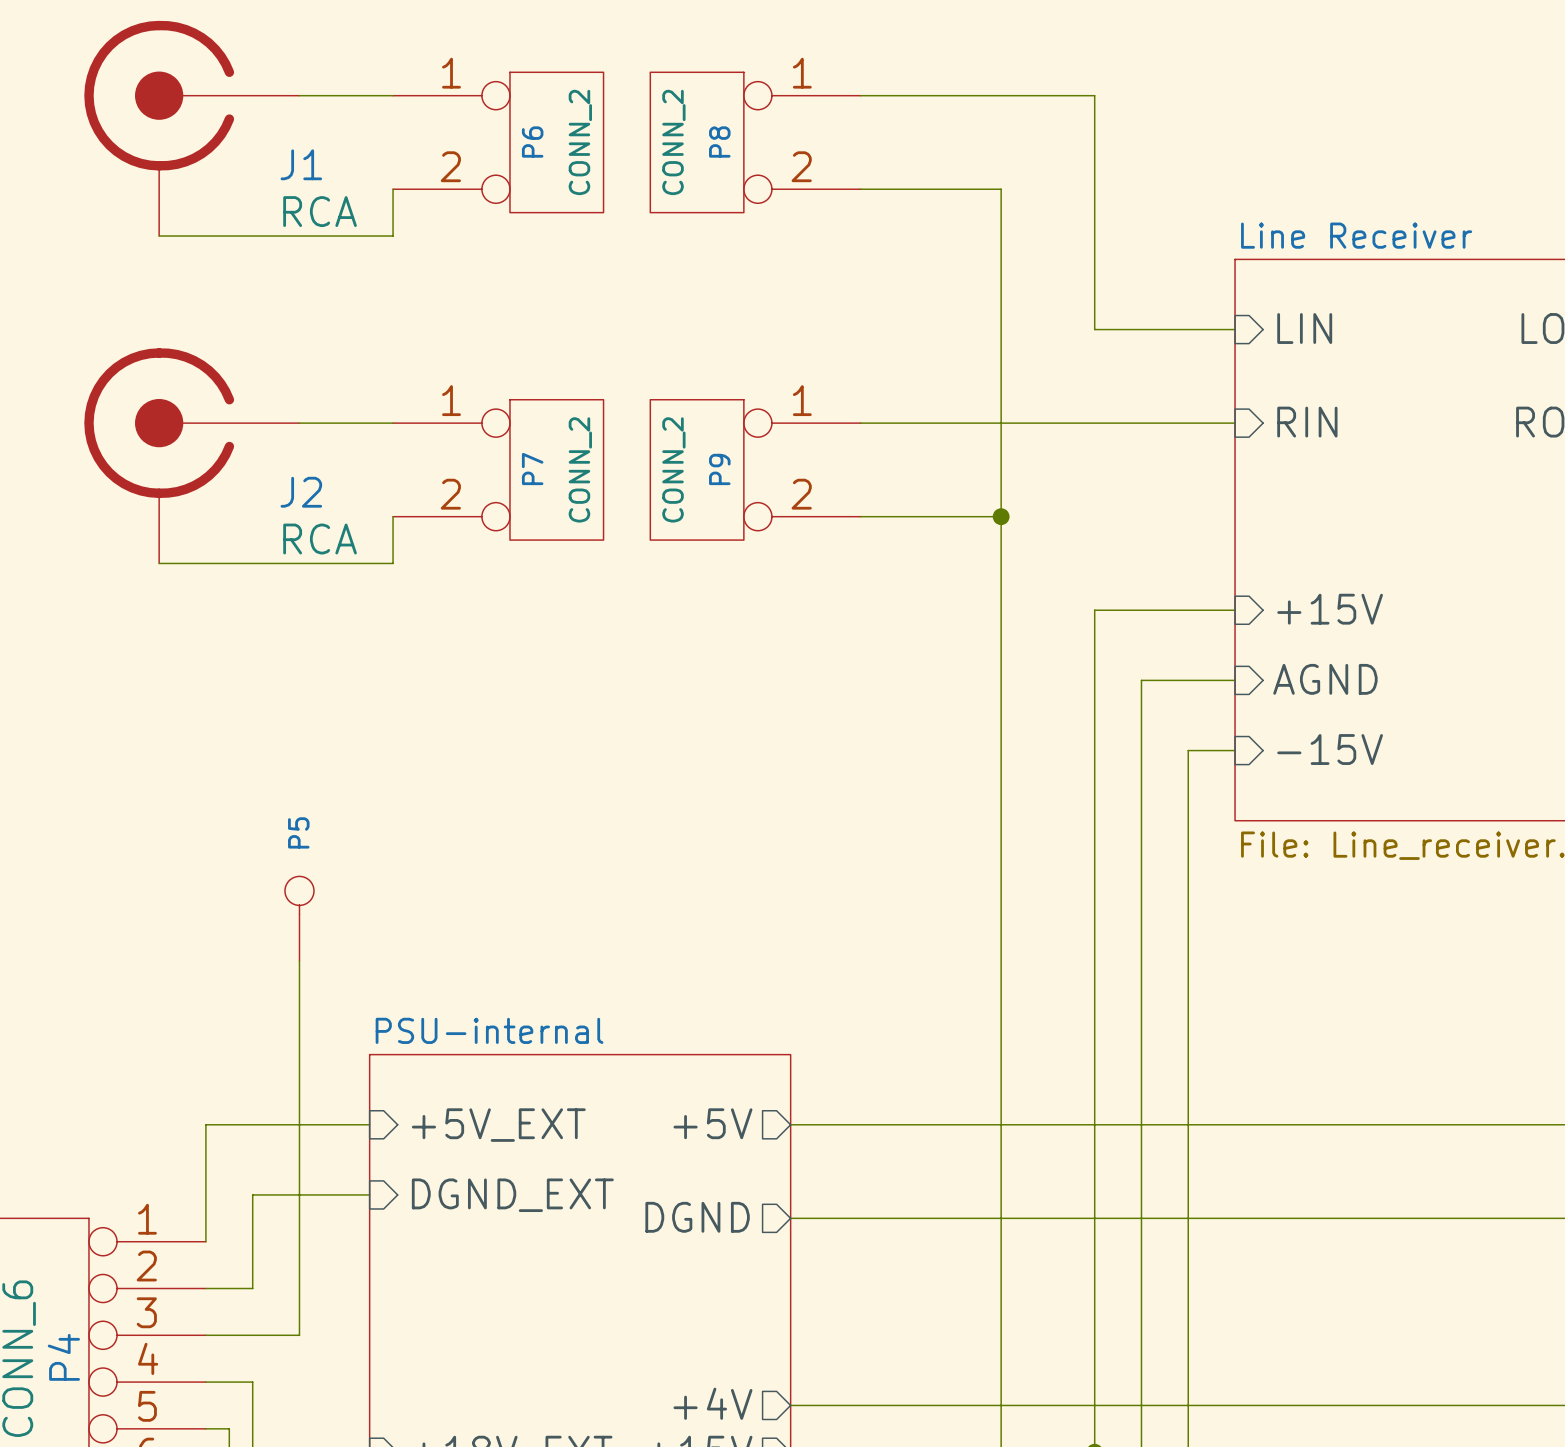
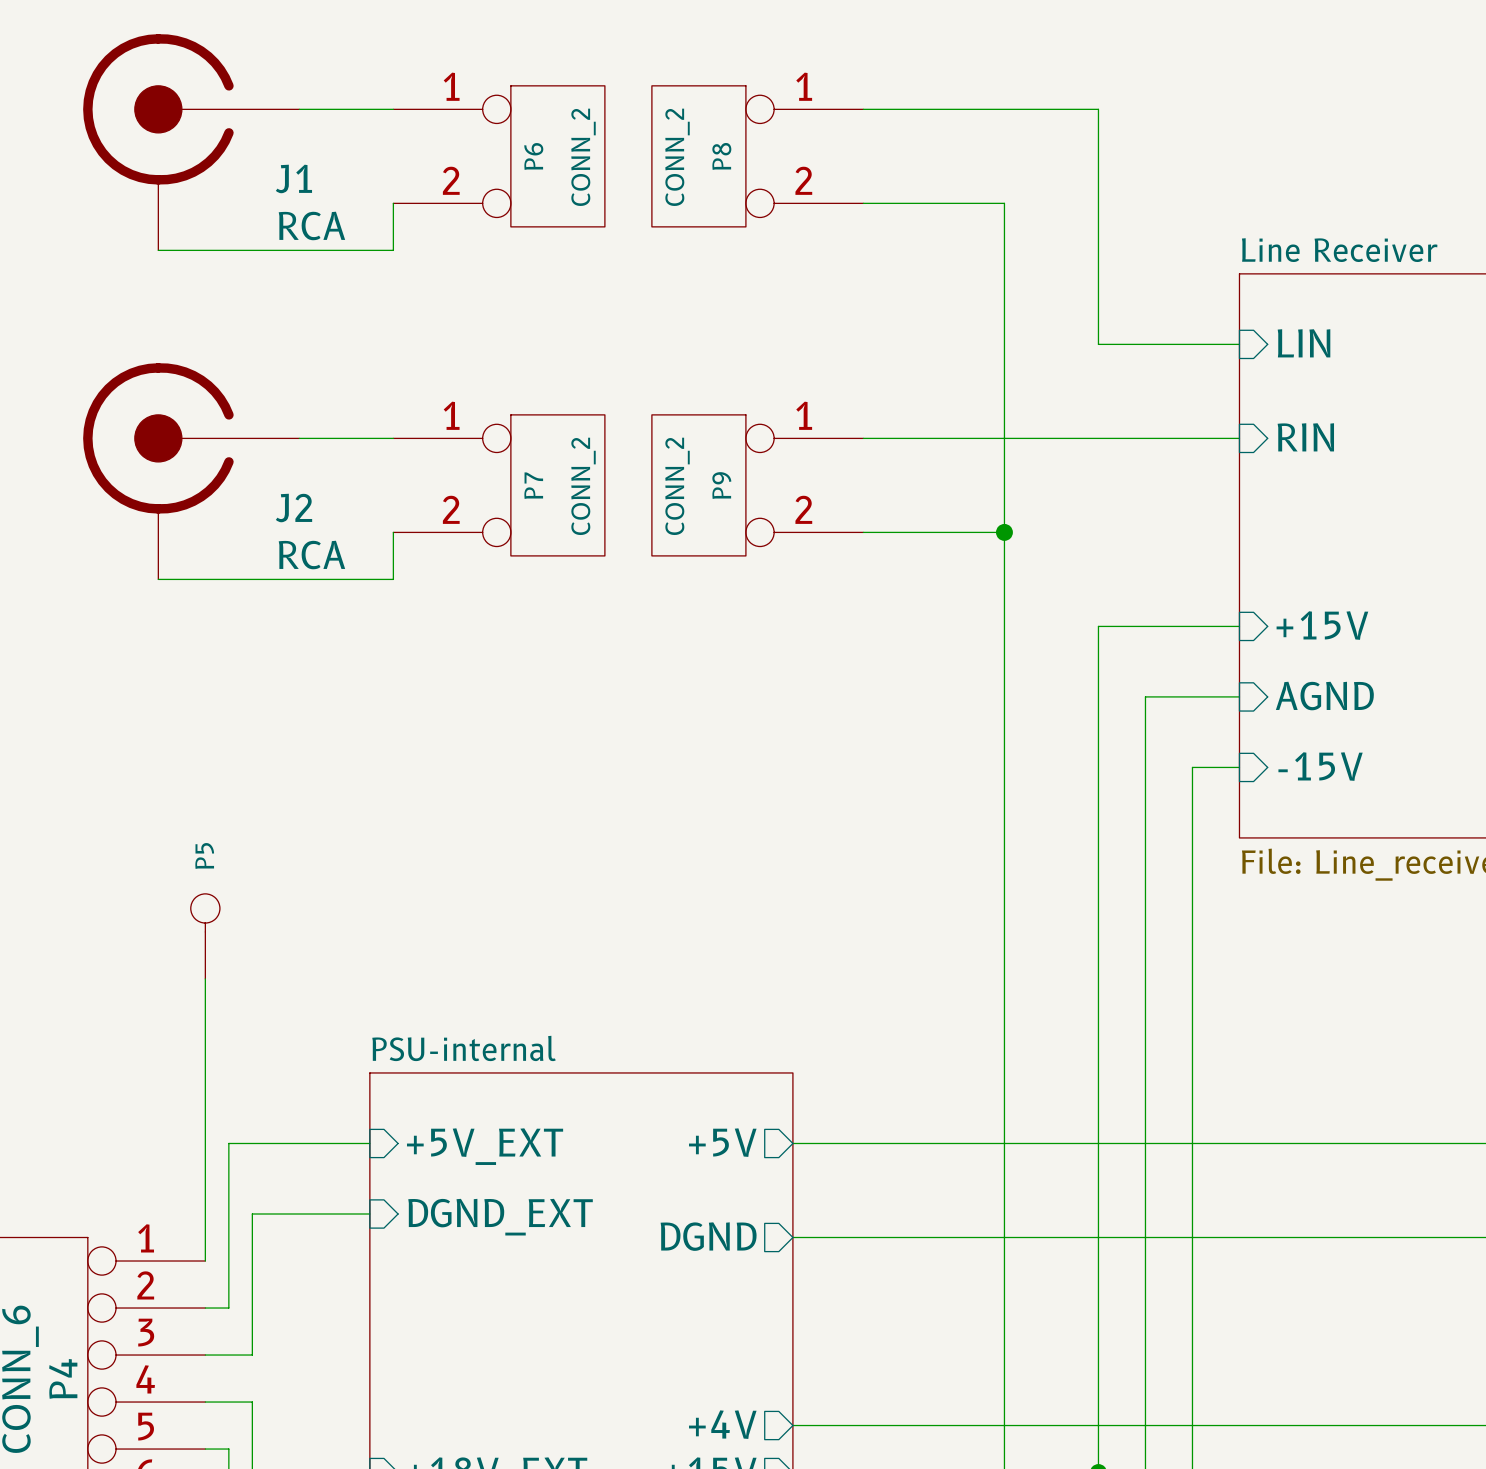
P5 position: (299, 918) -> (205, 936)
wire: (299, 961) (299, 1335) (252, 1335) -> none
wire: (205, 1124) (229, 1124) -> (205, 1143) (205, 978)
wire: none -> (228, 1143) (228, 1308)
wire: (229, 1288) (252, 1288) -> (252, 1355) (252, 1308)

